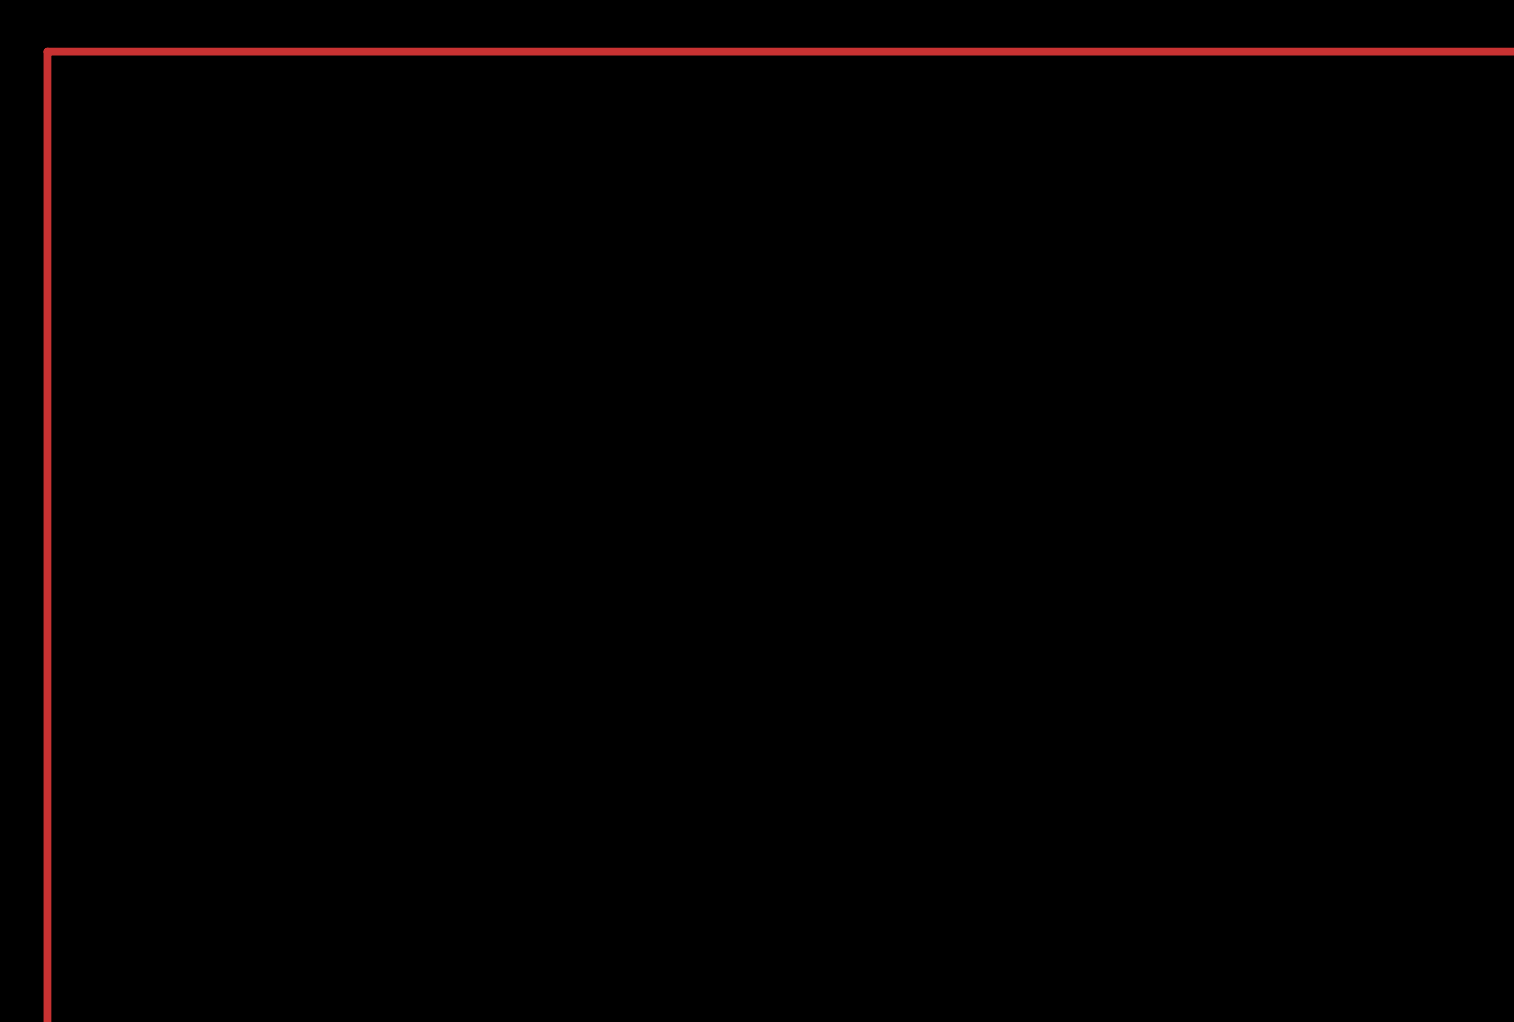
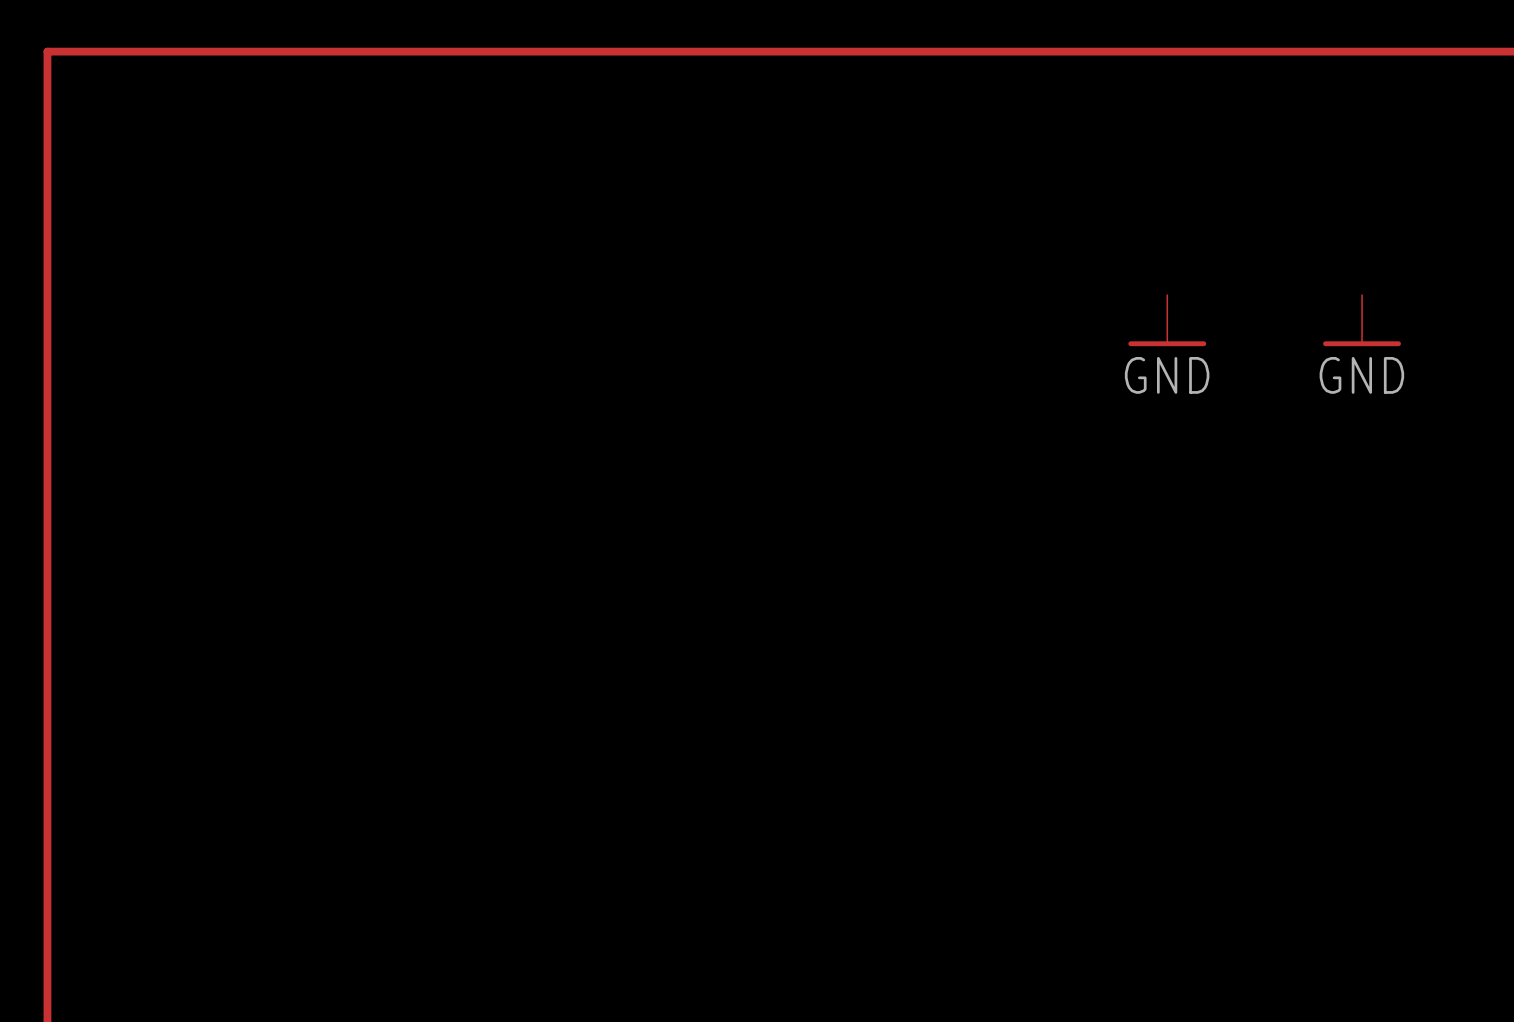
power symbol: none -> GND (1167, 320)
power symbol: none -> GND (1362, 320)

